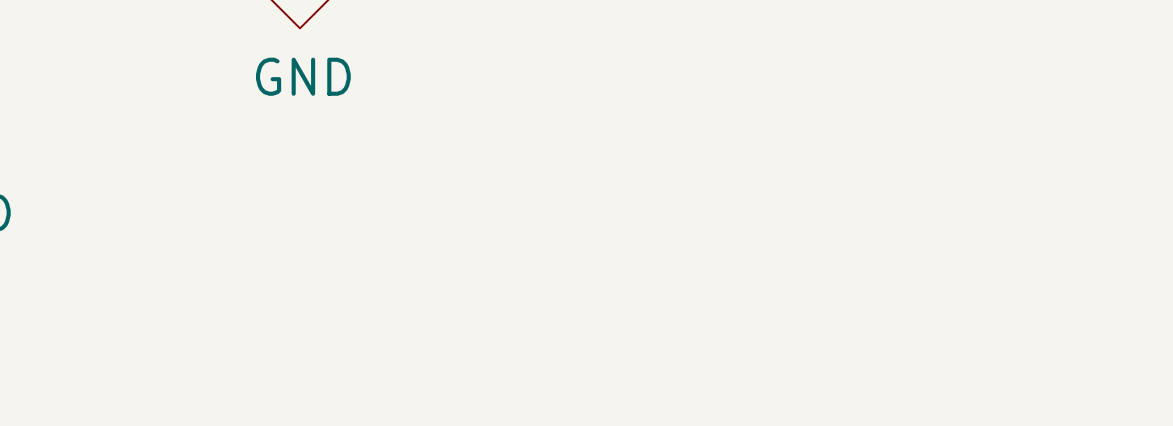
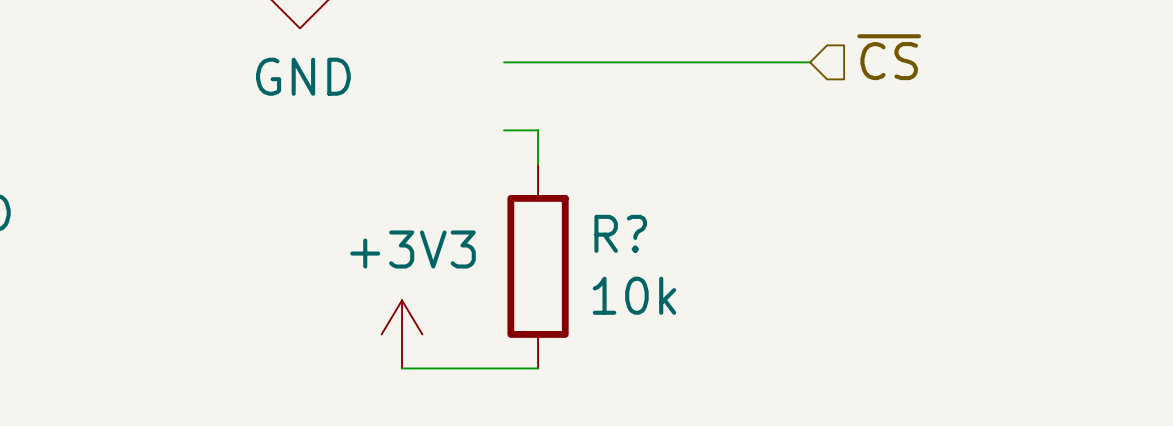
hierarchical label: none -> ~{CS} (889, 57)
wire: none -> (504, 62) (810, 62)
wire: none -> (504, 130) (538, 130) (538, 164)
R?: none -> 10k (538, 266)
power symbol: none -> +3V3 (402, 334)
wire: none -> (402, 368) (538, 368)

